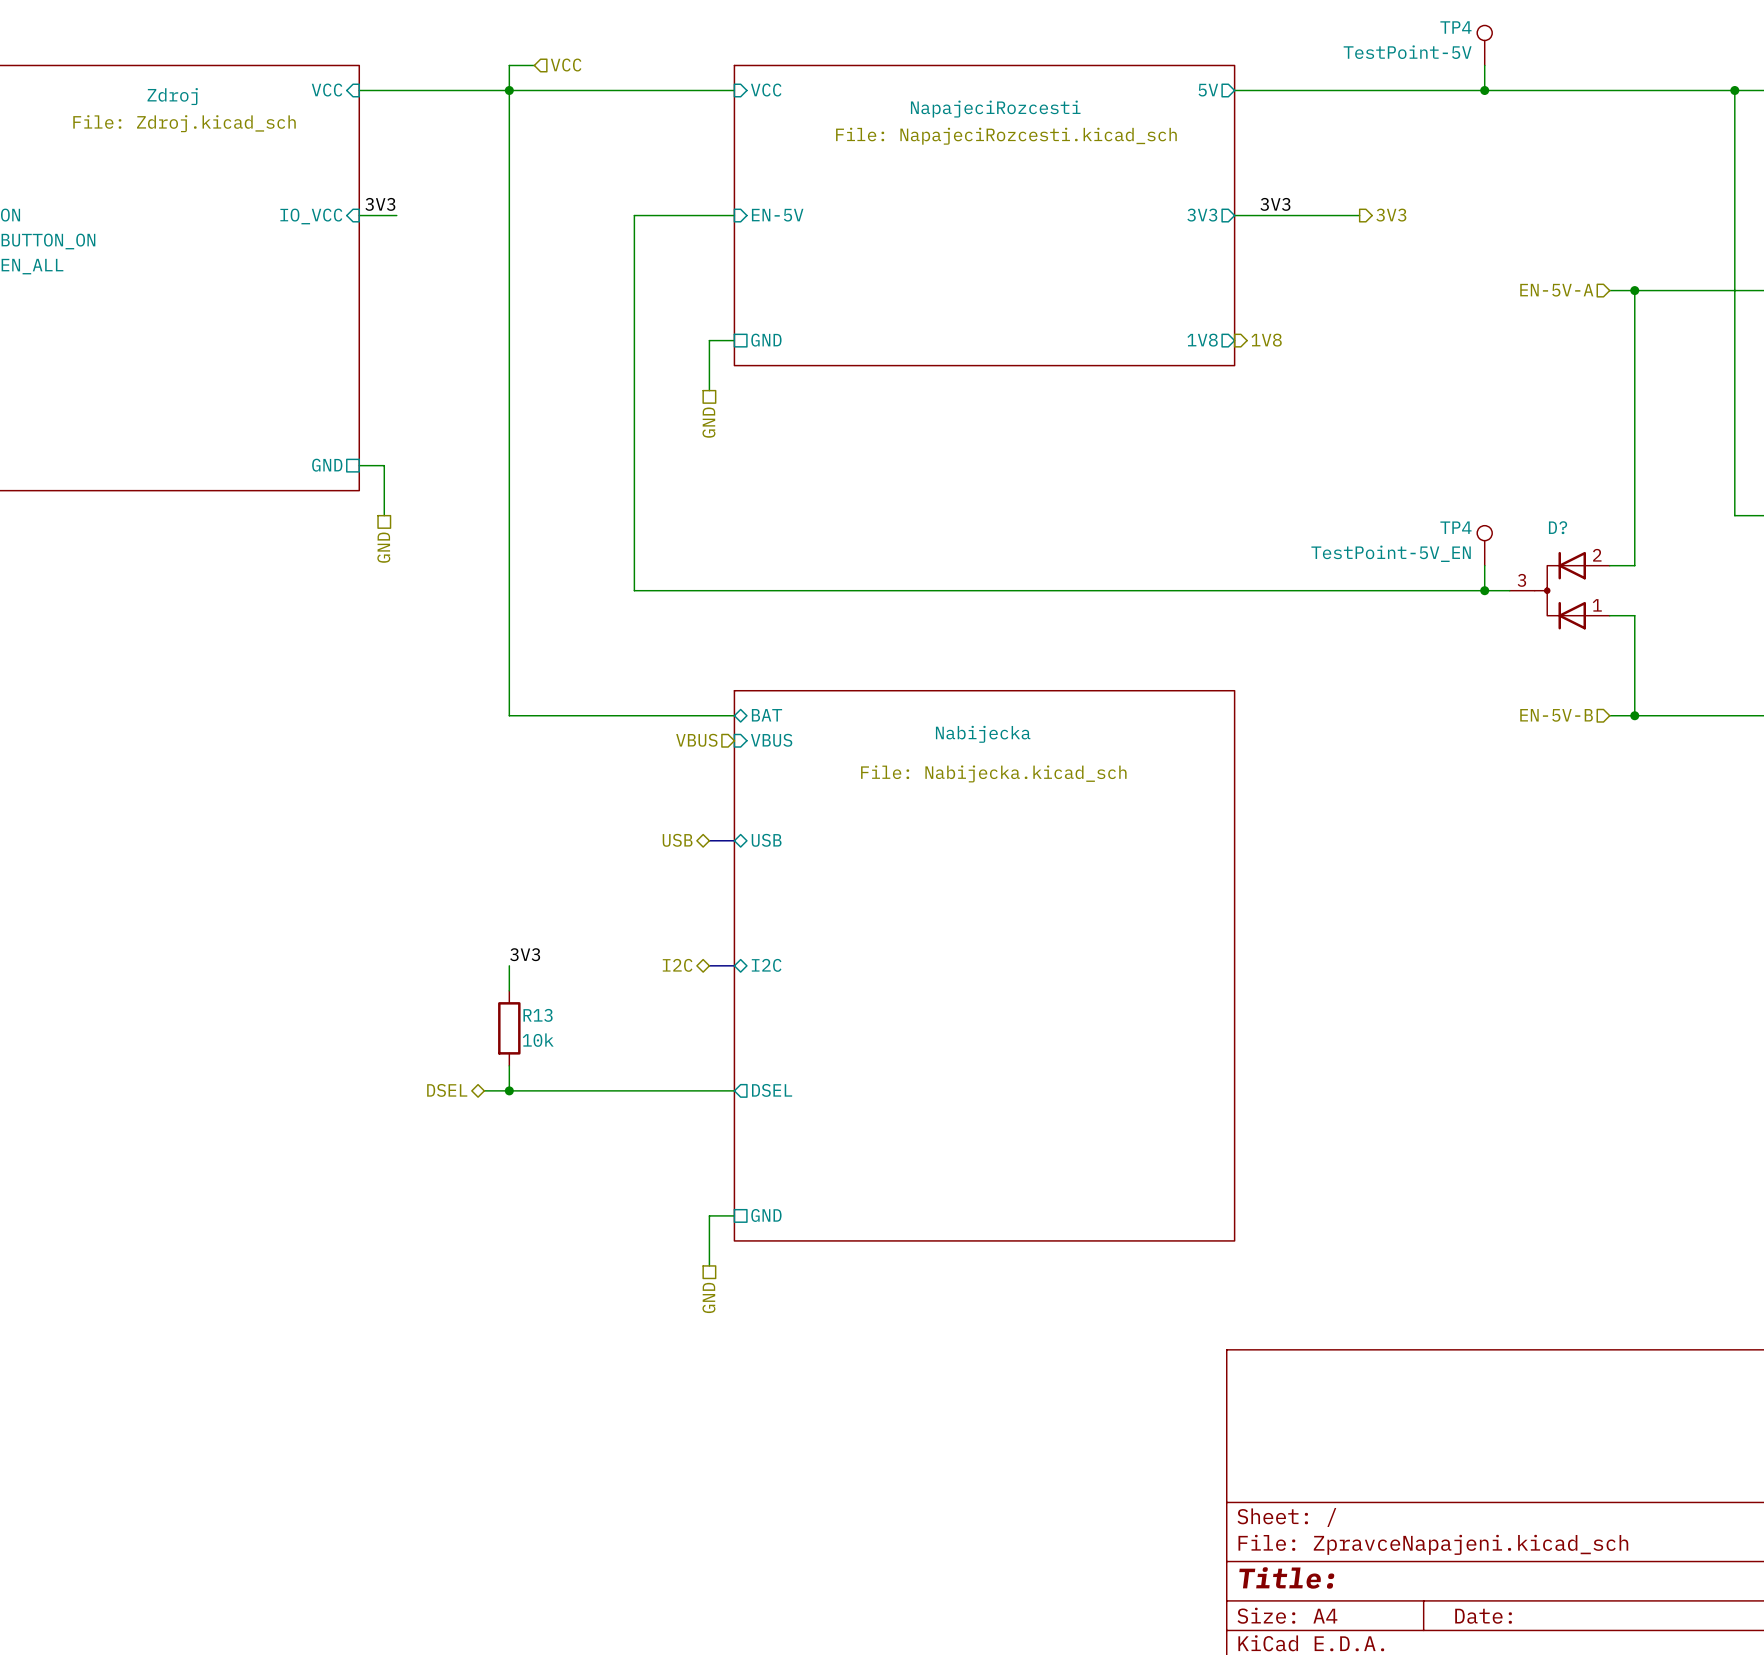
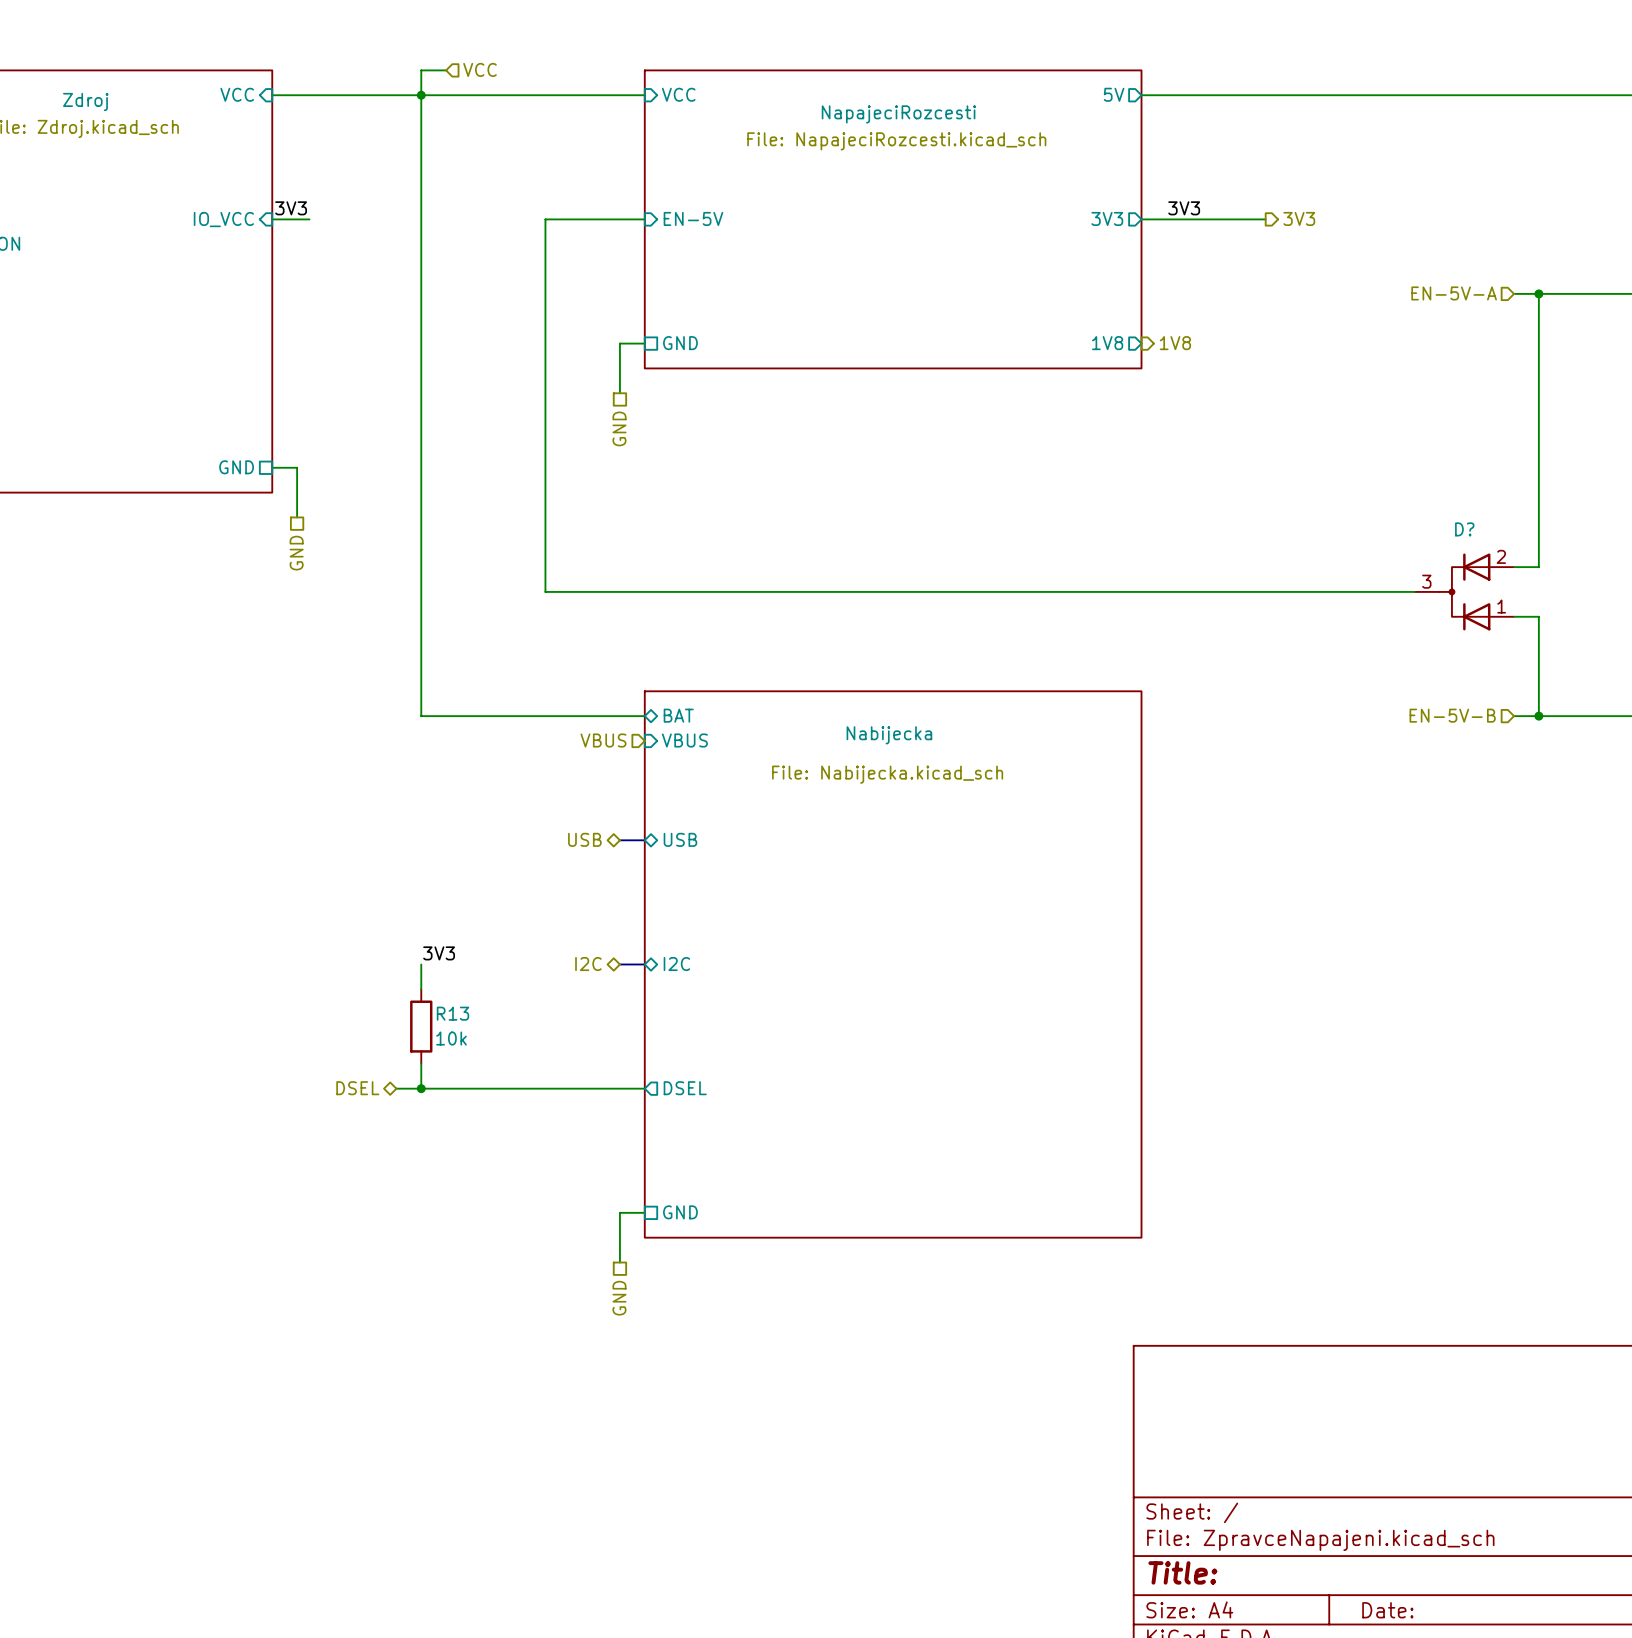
TP4: TestPoint-5V (1484, 45) -> none
wire: (1484, 65) (1484, 90) -> none
junction: (1484, 90) -> none
TP4: TestPoint-5V_EN (1484, 545) -> none
wire: (1484, 565) (1484, 590) -> none
junction: (1484, 590) -> none

